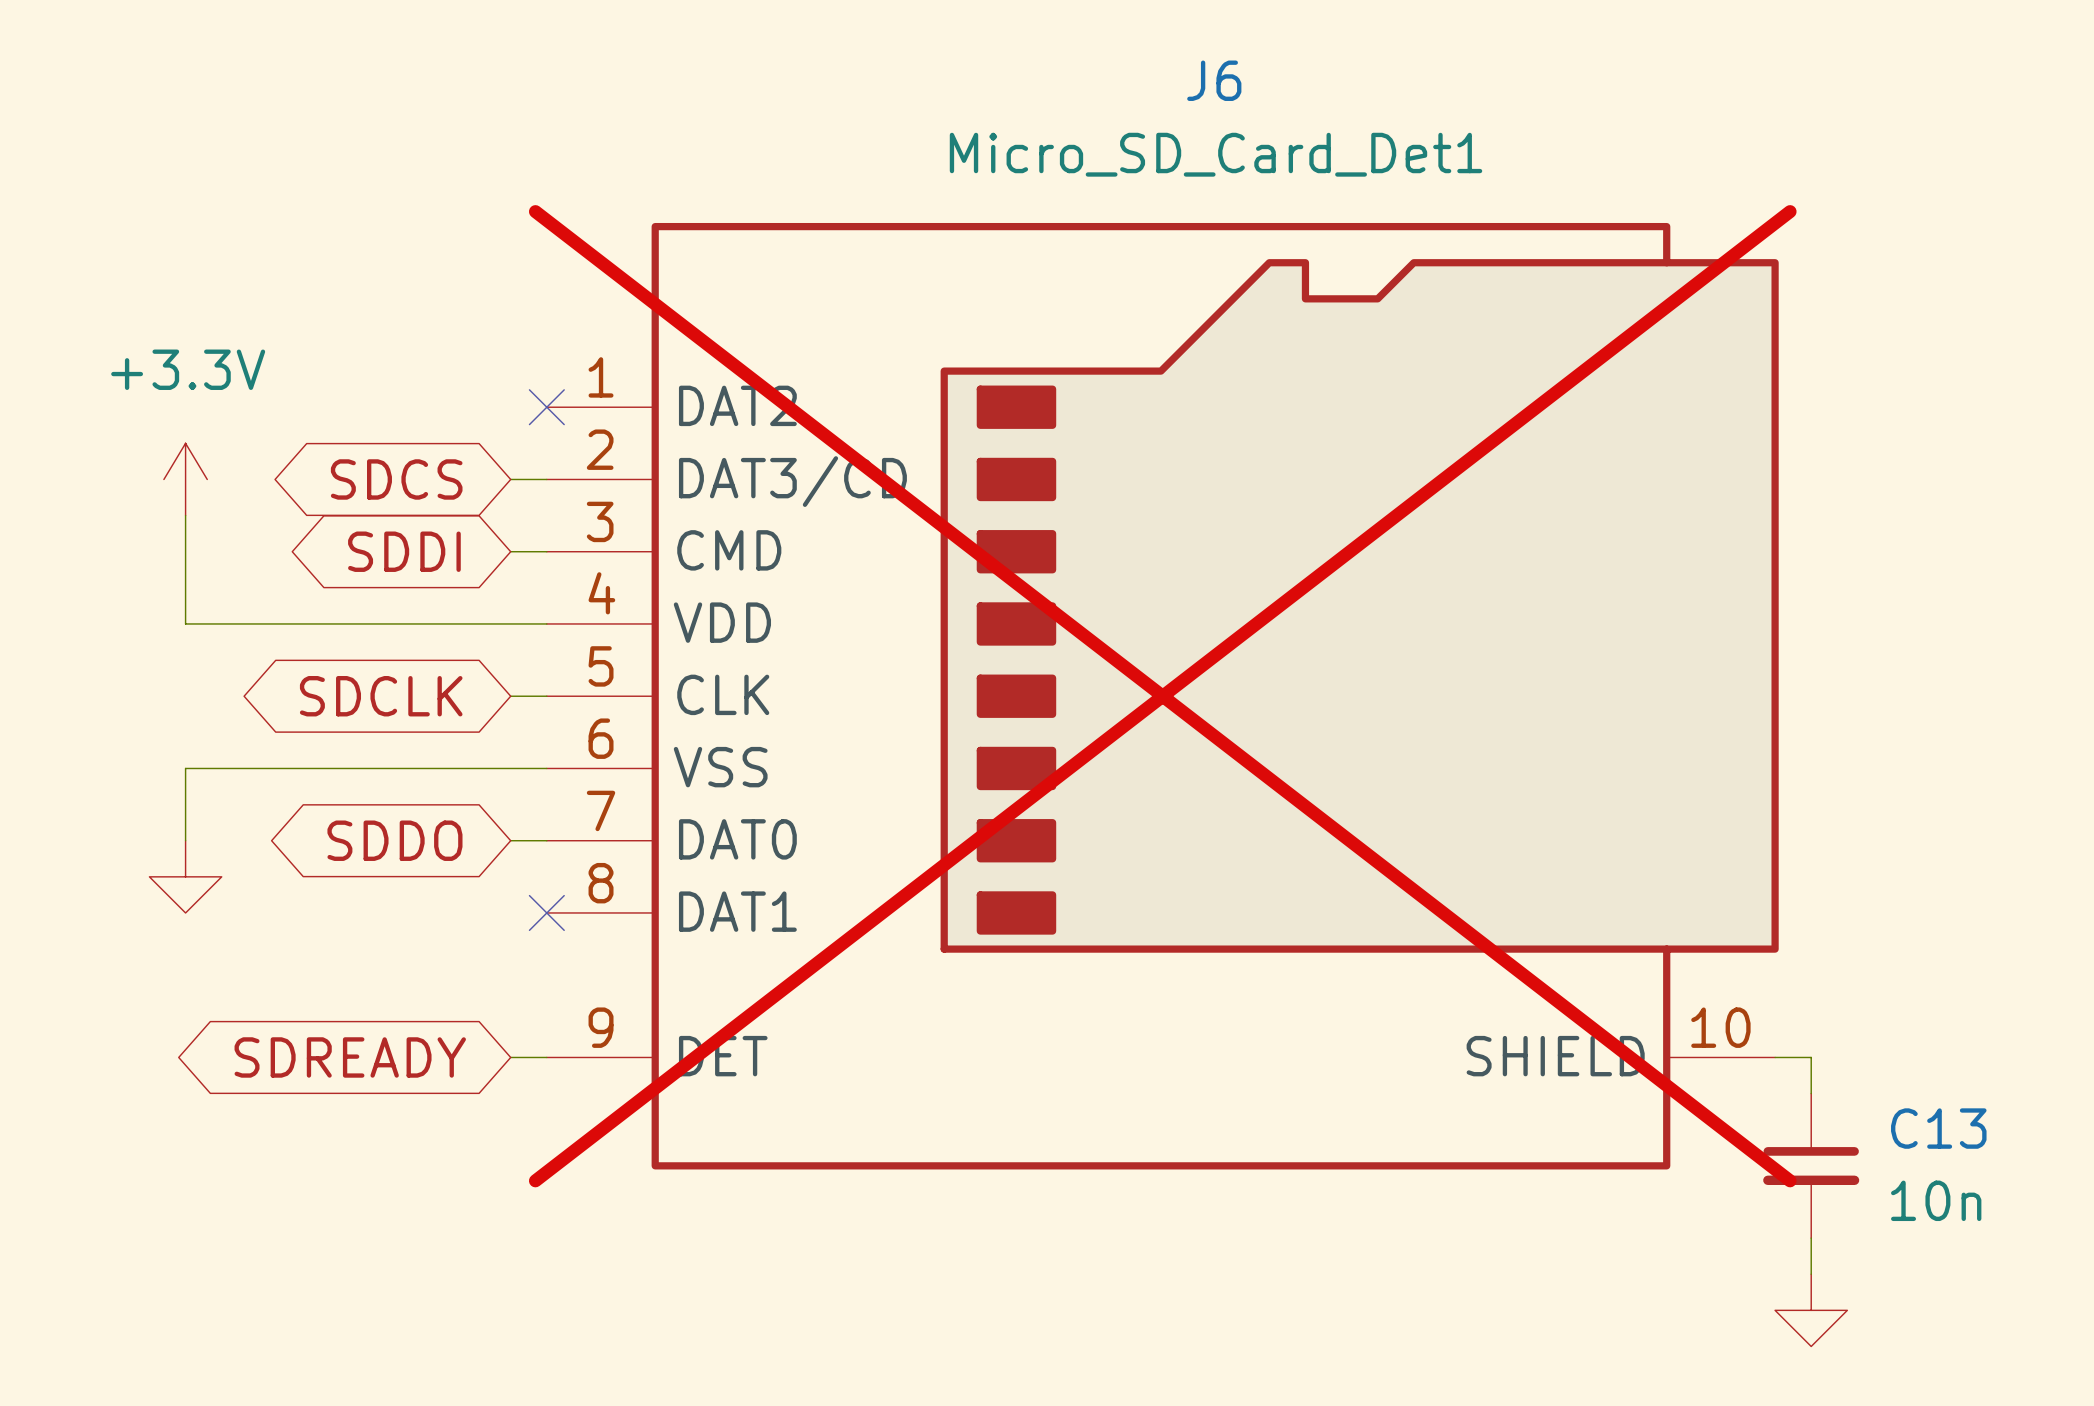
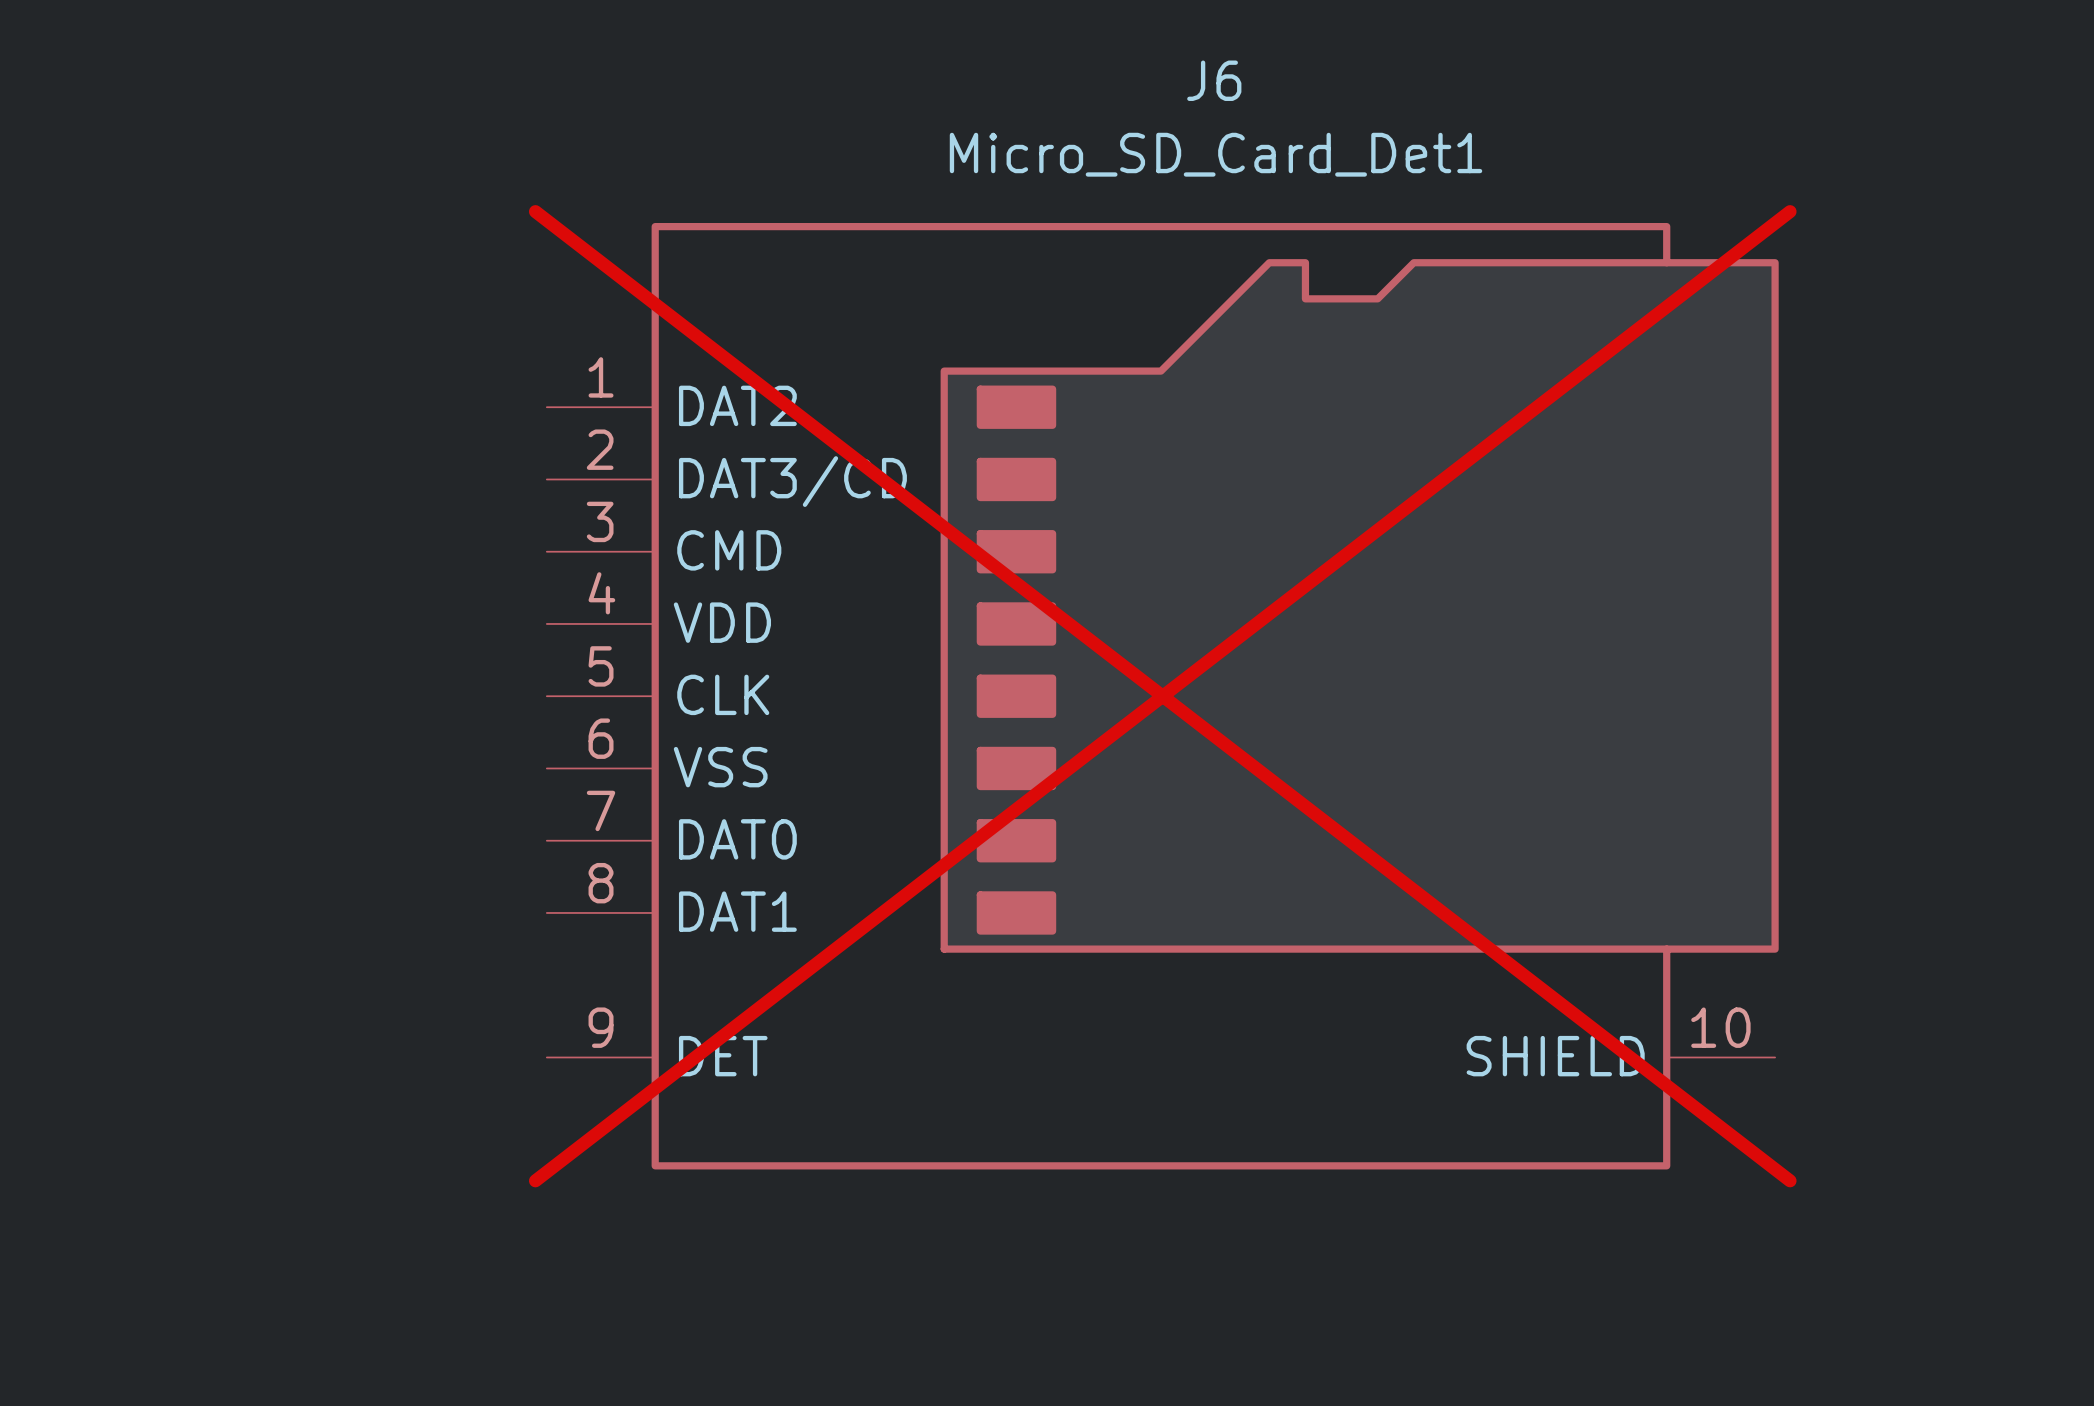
no-connect mark: (546, 407) -> none
power symbol: +3.3V (185, 479) -> none
global label: SDCS (396, 479) -> none
wire: (510, 479) (546, 479) -> none
wire: (185, 515) (185, 623) (546, 623) -> none
global label: SDDI (404, 551) -> none
wire: (510, 551) (546, 551) -> none
global label: SDCLK (381, 696) -> none
wire: (510, 696) (546, 696) -> none
wire: (546, 768) (185, 768) (185, 840) -> none
global label: SDDO (394, 840) -> none
wire: (510, 840) (546, 840) -> none
power symbol: (185, 876) -> none
no-connect mark: (546, 912) -> none
global label: SDREADY (350, 1057) -> none
wire: (510, 1057) (546, 1057) -> none
wire: (1775, 1057) (1811, 1057) (1811, 1093) -> none
C13: 10n (1811, 1165) -> none
wire: (1811, 1238) (1811, 1274) -> none
power symbol: (1811, 1310) -> none

